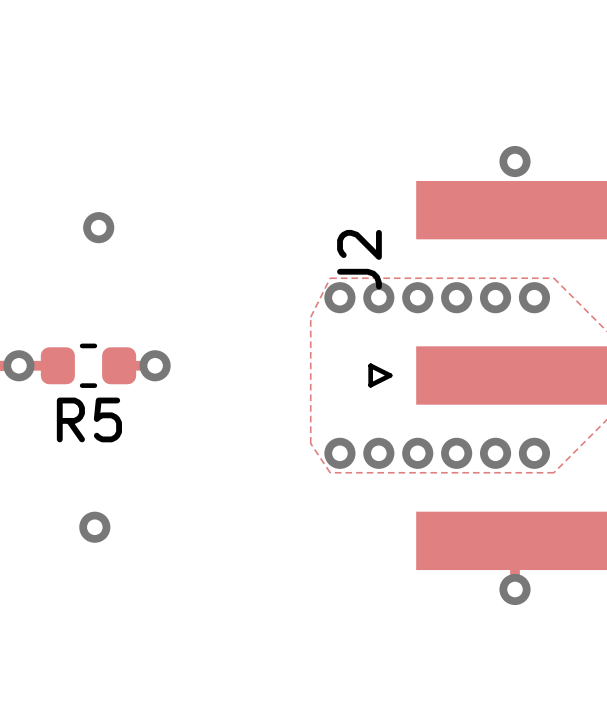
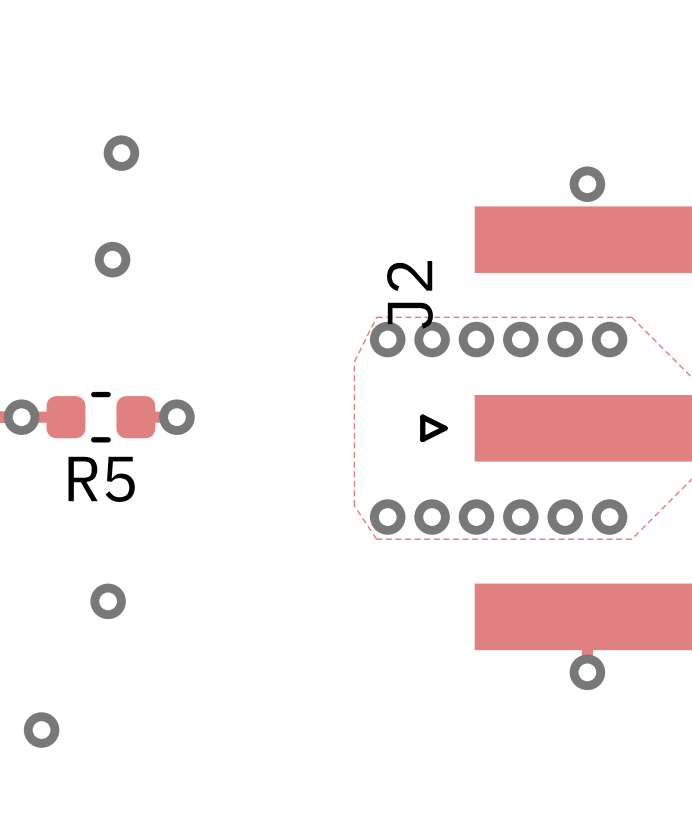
via: none -> (121, 153)
via: none -> (41, 730)

